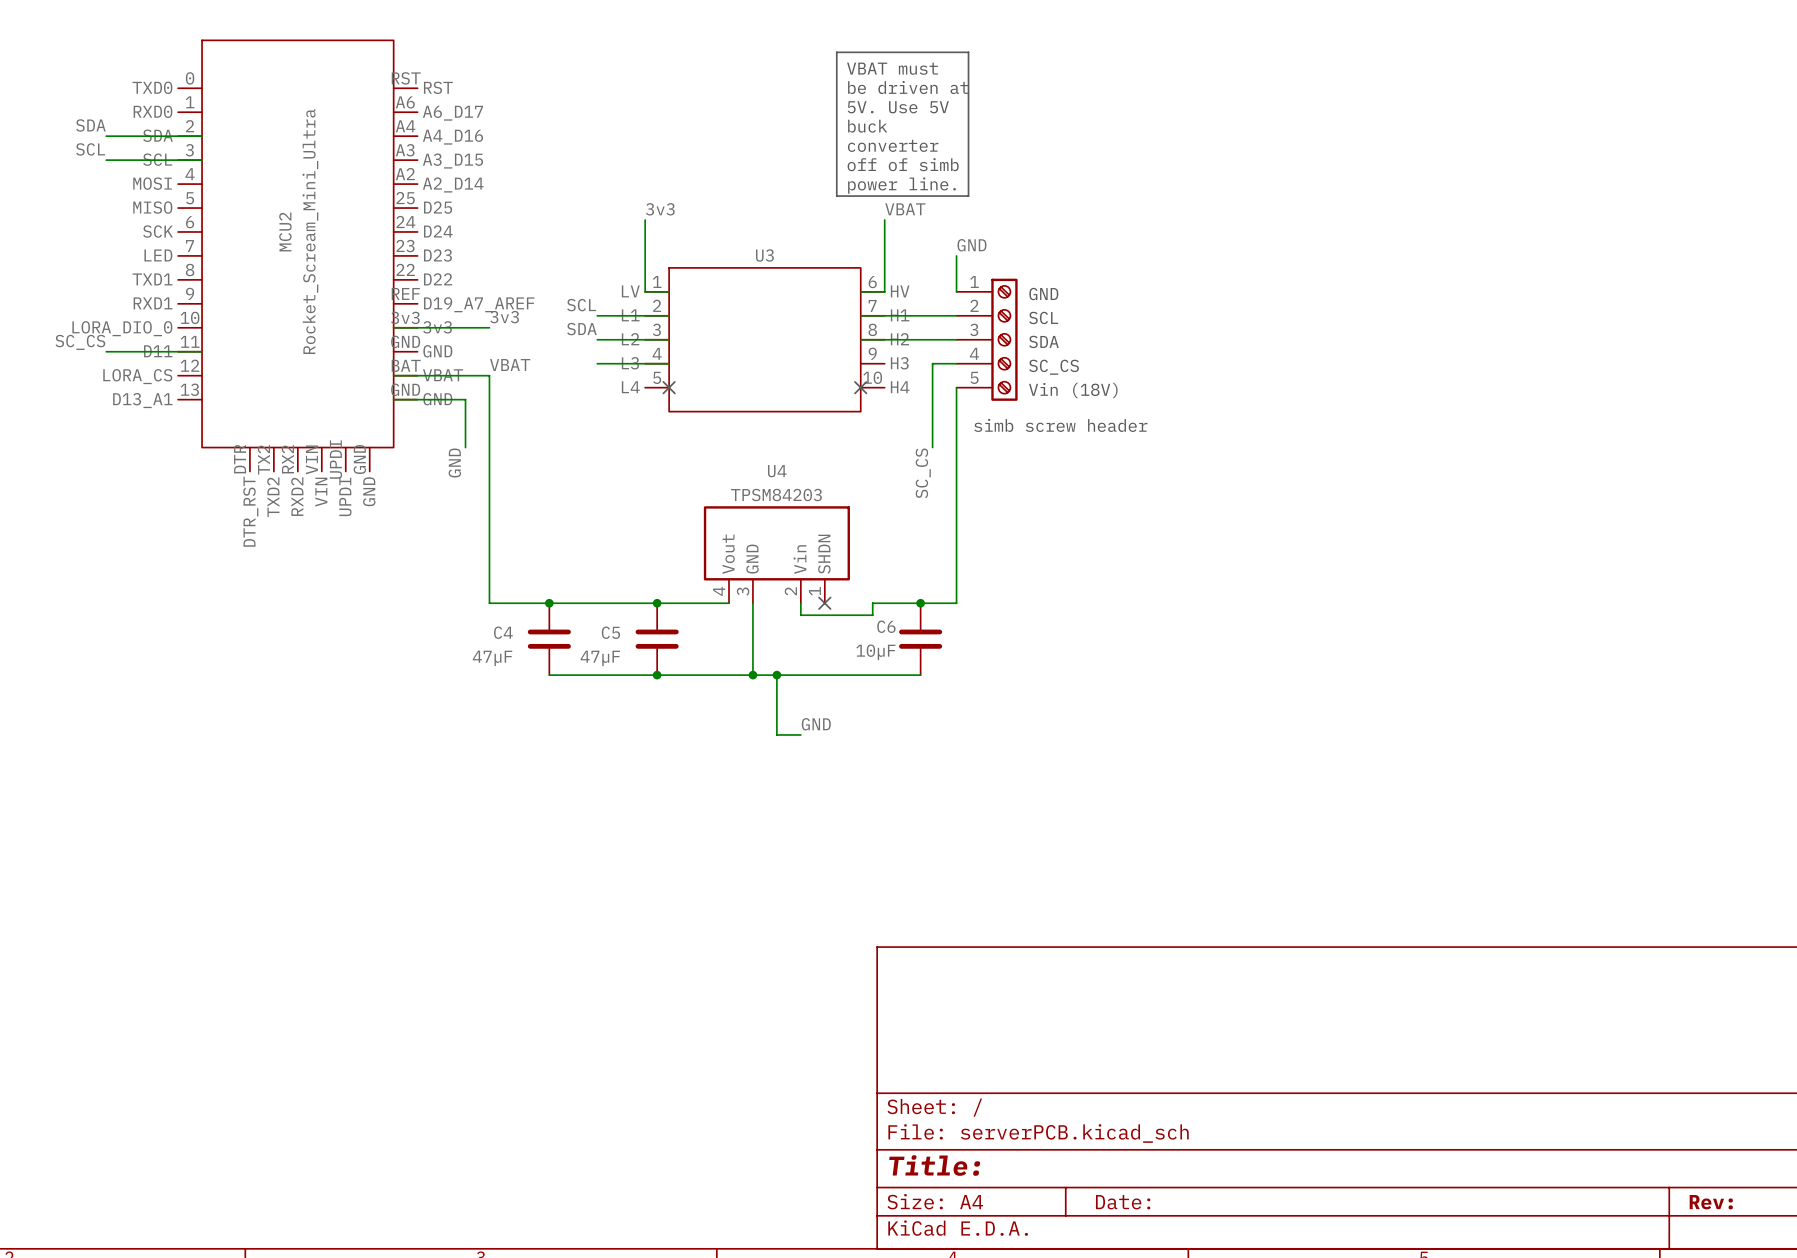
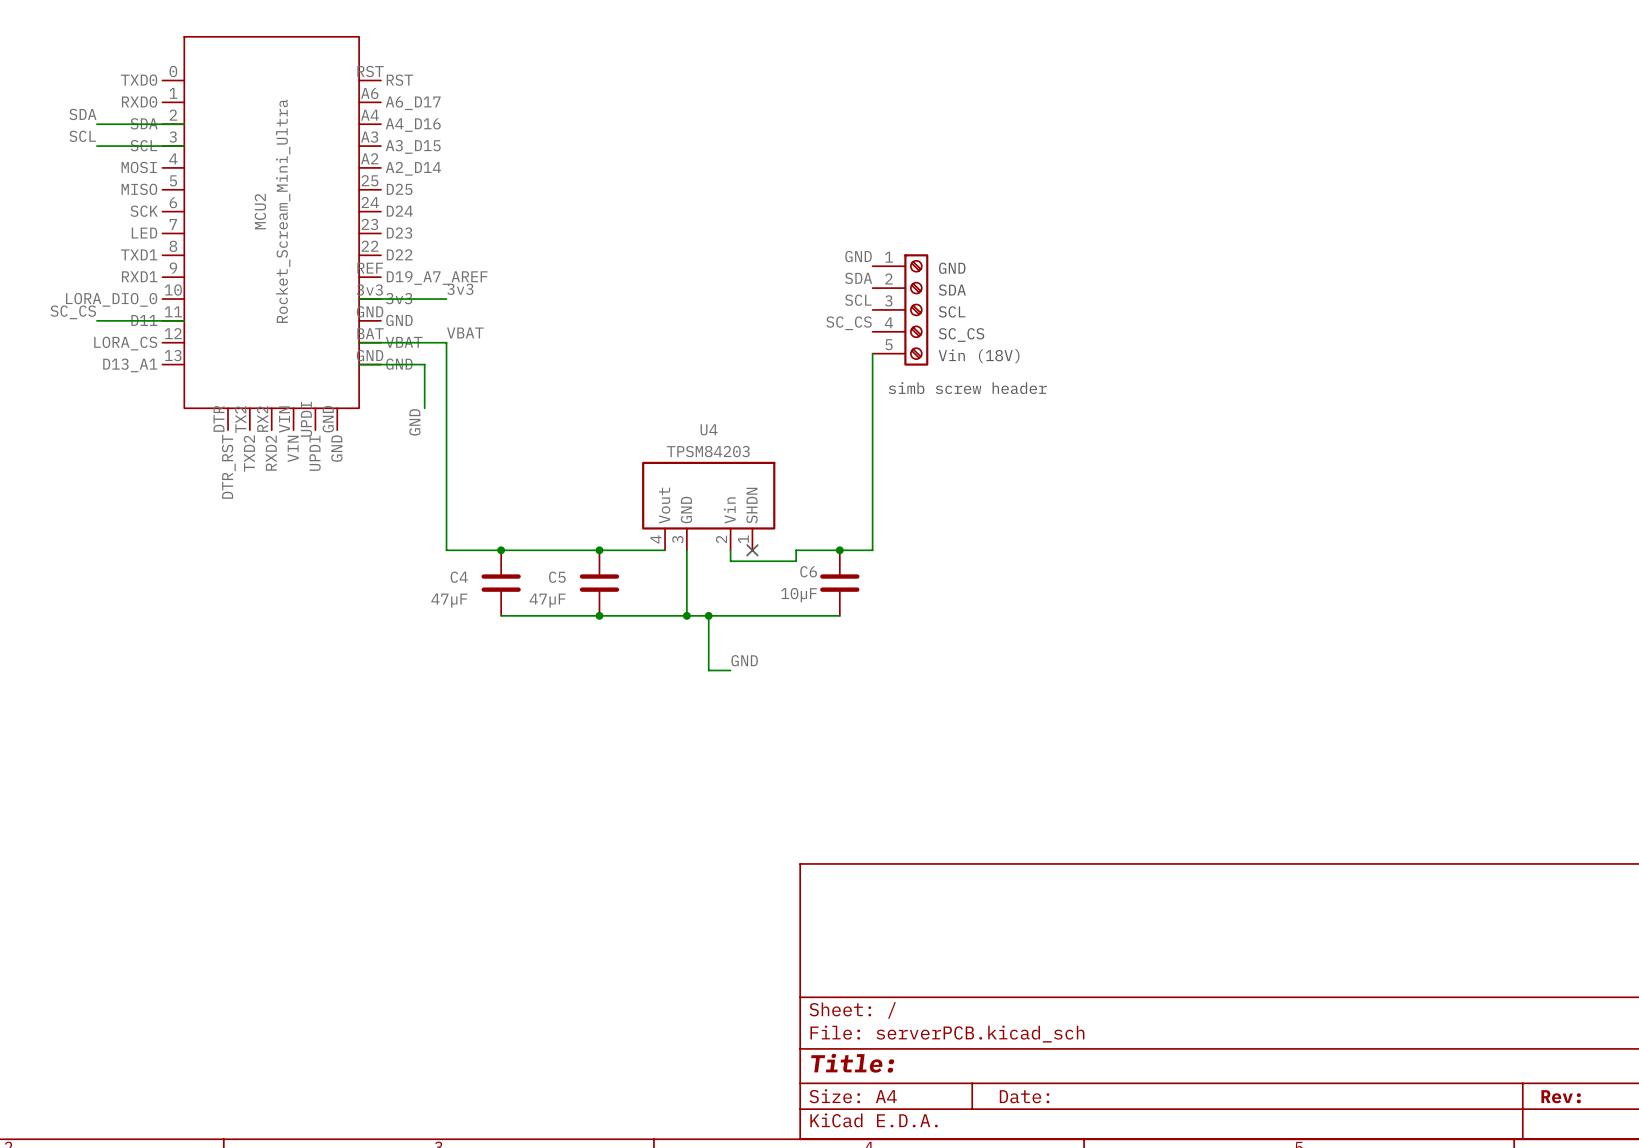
line: (836, 52) (968, 52) (968, 196) (836, 196) (836, 52) -> none
text: VBAT must (892, 68) -> none
text: be driven at (908, 87) -> none
text: 5V. Use 5V (898, 107) -> none
text: buck (867, 126) -> none
text: converter (893, 145) -> none
text: off of simb (903, 164) -> none
text: power line. (901, 185) -> none
label: 3v3 (660, 209) -> none
label: VBAT (905, 209) -> none
wire: (645, 220) (645, 291) (669, 291) -> none
wire: (884, 220) (884, 291) (860, 291) -> none
label position: GND (971, 245) -> GND (858, 256)
wire: (956, 255) (956, 291) -> none
label: SCL (581, 305) -> none
label: none -> SDA (858, 278)
wire: (597, 315) (669, 315) -> none
wire: (860, 315) (956, 315) -> none
text: SCL (1043, 317) -> SDA (952, 290)
label: SDA (581, 329) -> none
label: none -> SCL (858, 300)
wire: (597, 339) (669, 339) -> none
U3: (764, 339) -> none
wire: (860, 339) (956, 339) -> none
text: SDA (1043, 341) -> SCL (952, 311)
wire: (597, 363) (669, 363) -> none
wire: (956, 363) (932, 363) (932, 447) -> none
no-connect mark: (669, 387) -> none
no-connect mark: (860, 387) -> none
label rotation: 0° (923, 473) -> 90° clockwise (849, 323)
label position: SC_CS (923, 473) -> SC_CS (849, 323)

